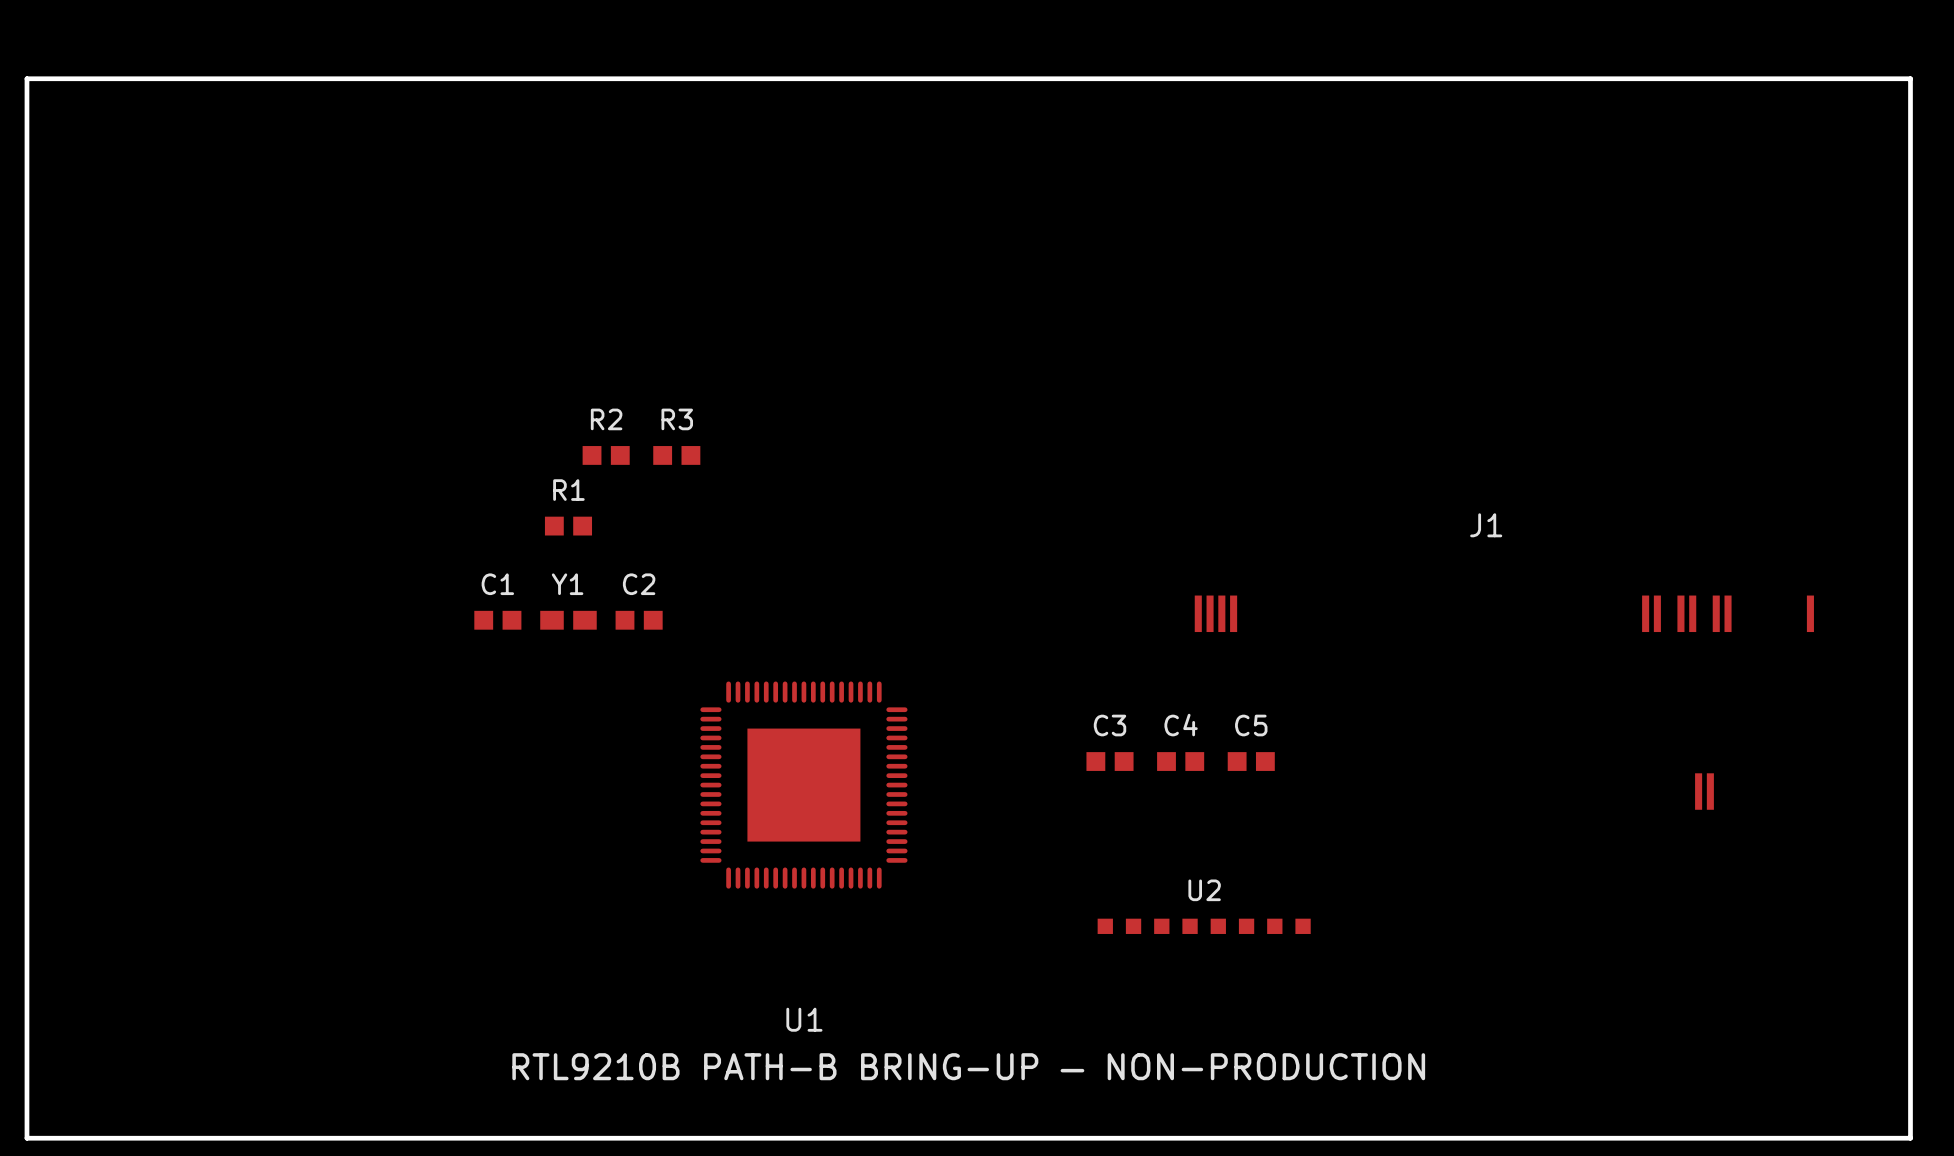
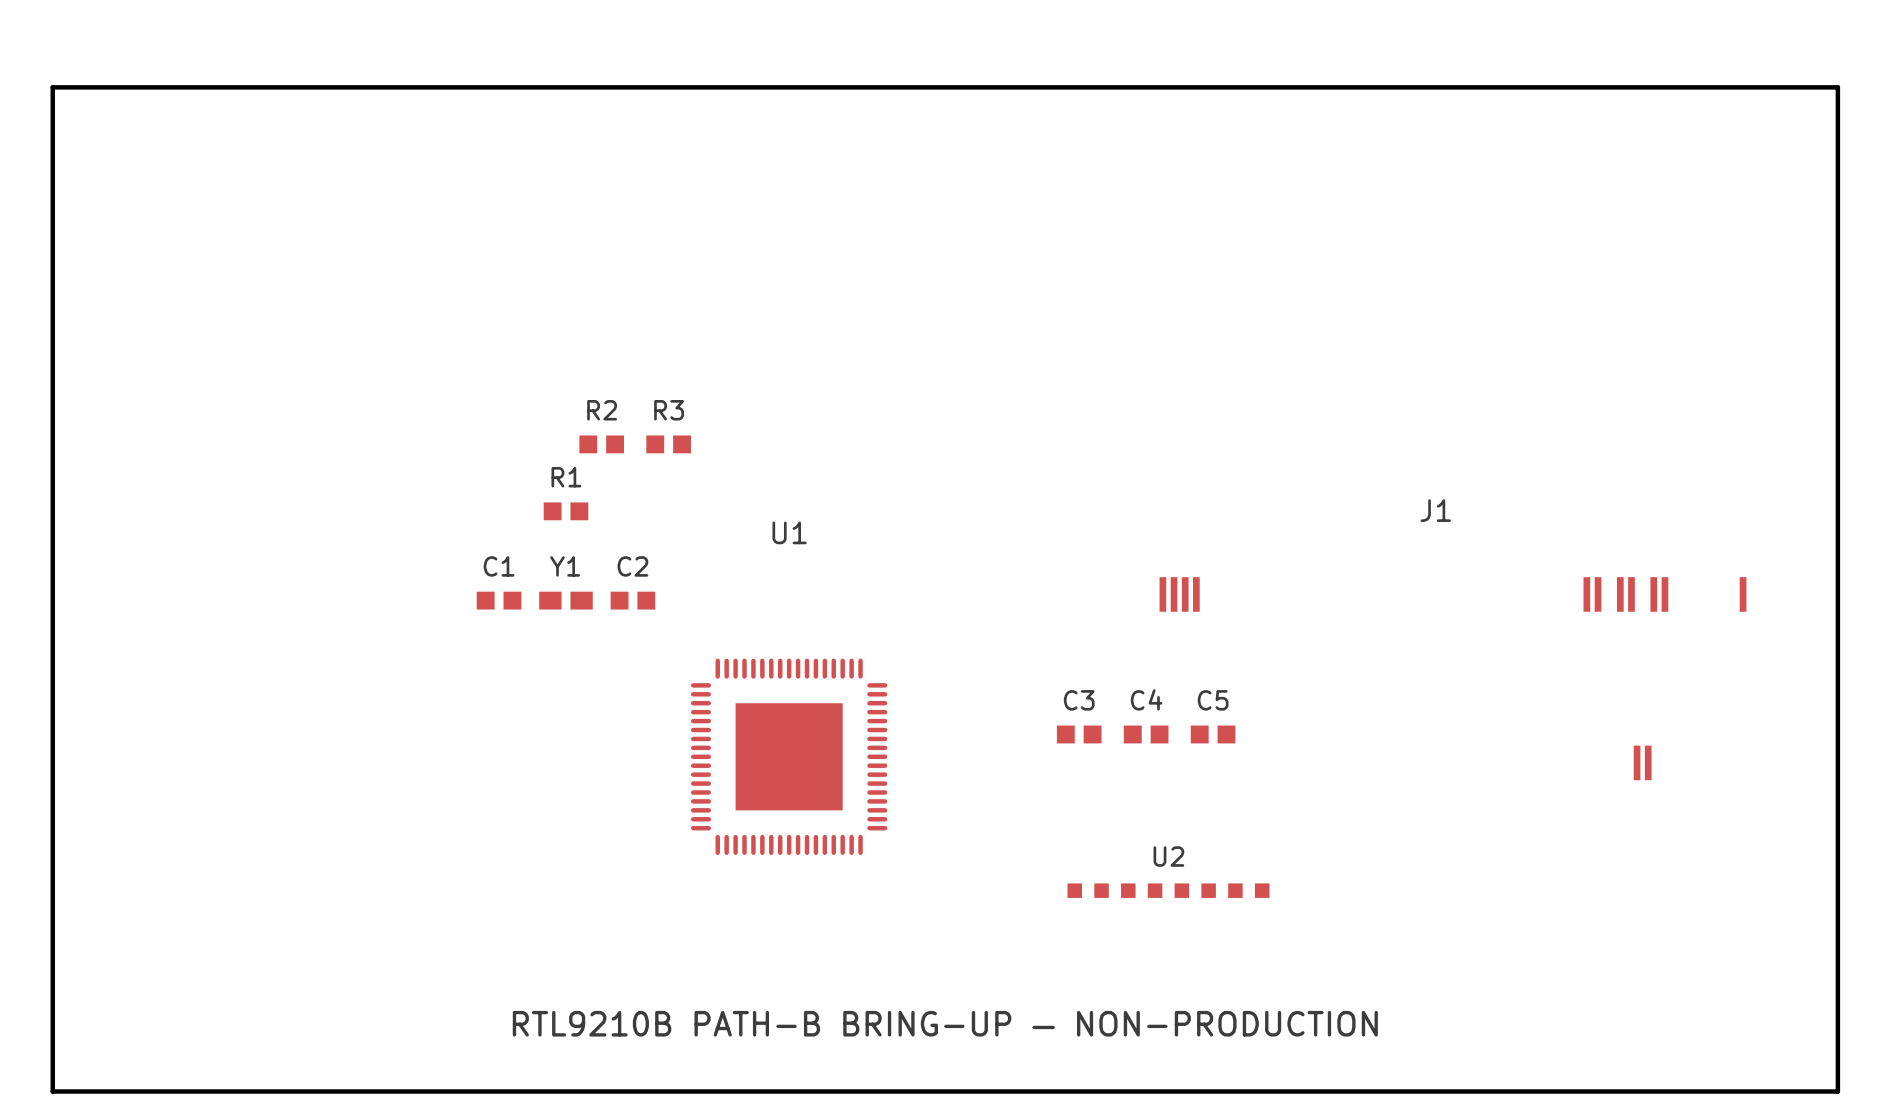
U1 name position: U1 (804, 1019) -> U1 (789, 532)

